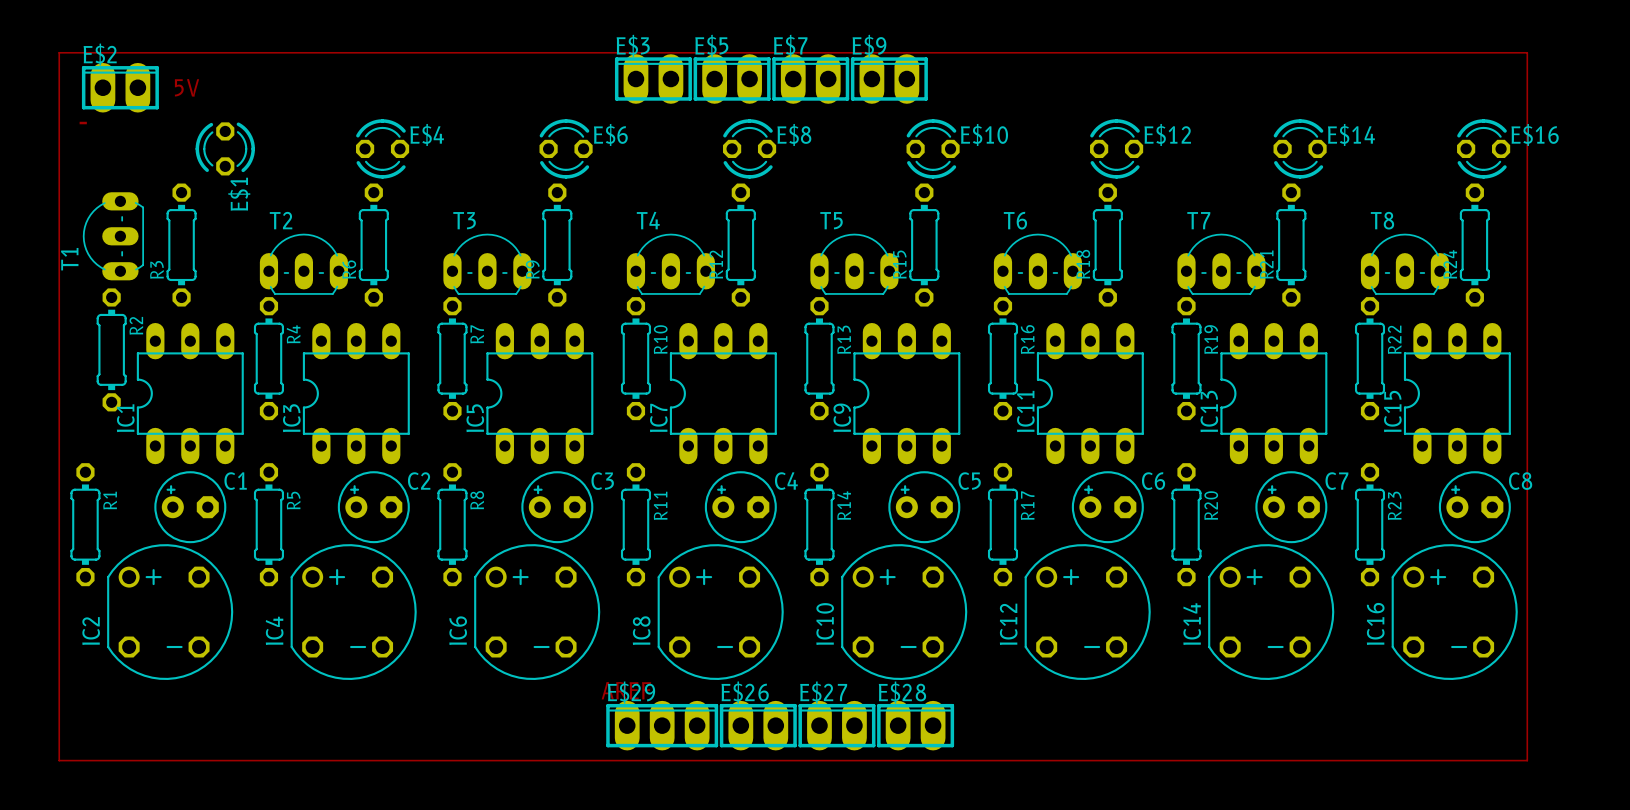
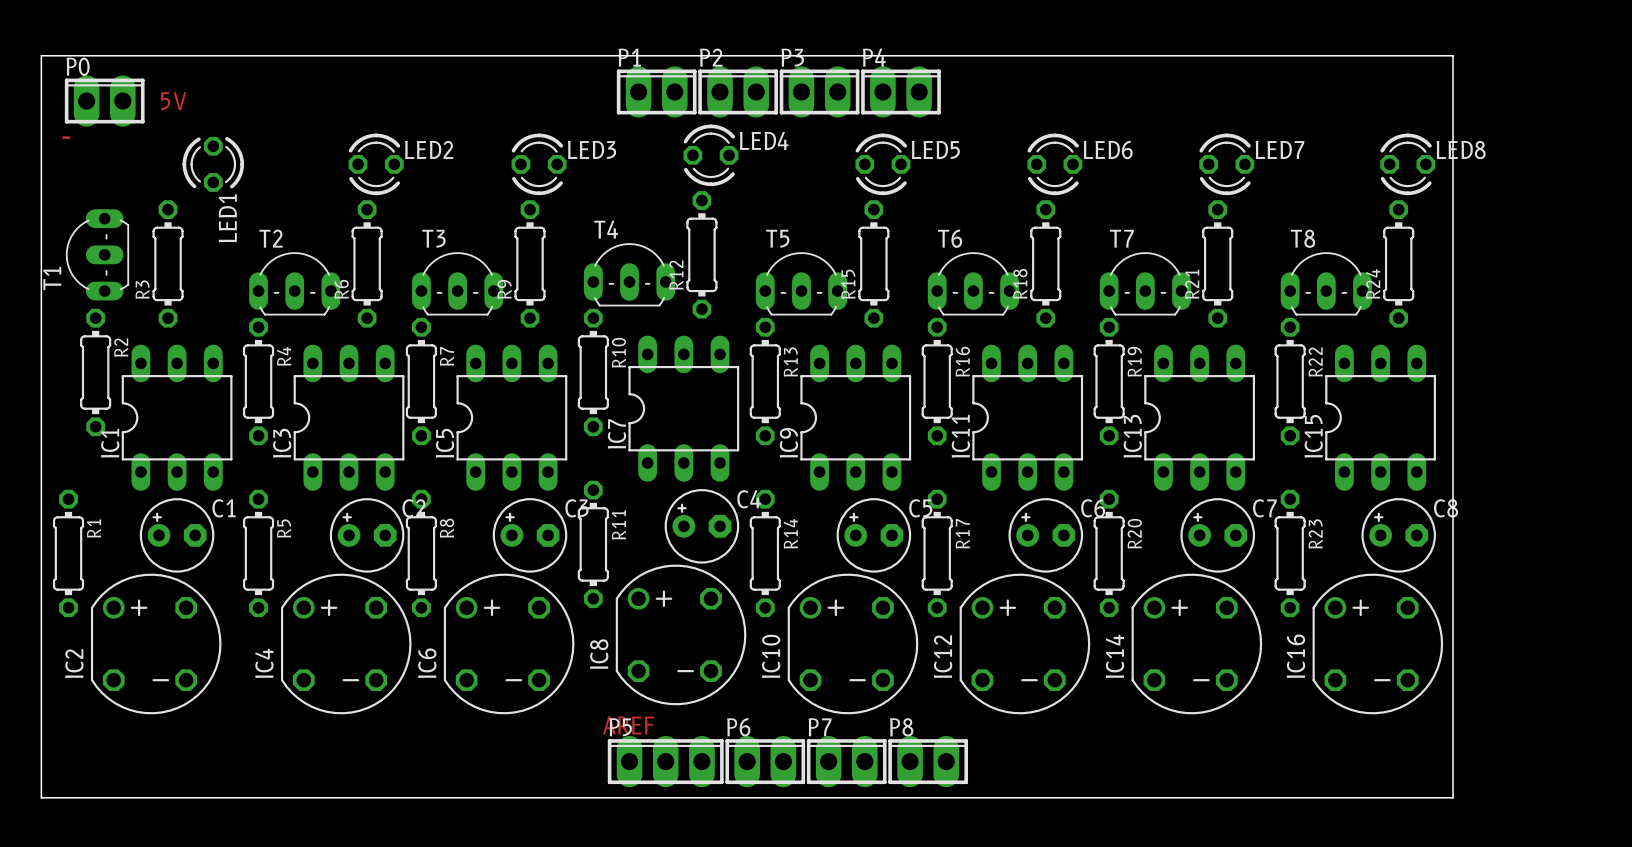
board edge: none -> (41, 55) (1453, 55) (1453, 797) (41, 797) (41, 55)
E$3 name: E$3 (633, 45) -> P1 (629, 57)
E$5 name: E$5 (711, 45) -> P2 (711, 57)
E$7 name: E$7 (790, 45) -> P3 (792, 57)
E$9 name: E$9 (869, 45) -> P4 (874, 57)
track: (59, 52) (1527, 52) (1527, 760) (59, 760) (59, 52) -> none
E$2 name: E$2 (100, 54) -> P0 (78, 66)
E$4 name: E$4 (427, 134) -> LED2 (429, 149)
LED4: none -> (710, 155)
LED3: none -> (539, 164)
E$6: (566, 148) -> none
E$8: (749, 148) -> none
LED5: none -> (882, 164)
E$10: (933, 148) -> none
LED6: none -> (1054, 164)
E$12: (1116, 148) -> none
LED7: none -> (1226, 164)
E$14: (1300, 148) -> none
LED8: none -> (1407, 164)
E$16: (1483, 148) -> none
E$1 name: E$1 (239, 194) -> LED1 (227, 218)
R9 position: (557, 245) -> (530, 263)
R12 position: (740, 245) -> (701, 254)
R15 position: (924, 245) -> (873, 263)
R18 position: (1107, 245) -> (1045, 263)
R21 position: (1291, 245) -> (1217, 263)
R24 position: (1474, 245) -> (1398, 263)
T3 position: (487, 264) -> (457, 283)
T4 position: (670, 264) -> (629, 274)
T5 position: (854, 264) -> (801, 283)
T6 position: (1037, 264) -> (973, 283)
T7 position: (1221, 264) -> (1145, 283)
T8 position: (1404, 264) -> (1326, 283)
R7 position: (452, 358) -> (421, 381)
R10 position: (635, 358) -> (593, 372)
R13 position: (819, 358) -> (765, 381)
R16 position: (1002, 358) -> (937, 381)
R19 position: (1186, 358) -> (1109, 381)
R22 position: (1370, 358) -> (1290, 381)
IC5 position: (539, 393) -> (511, 417)
IC7 position: (723, 393) -> (683, 408)
IC9 position: (906, 393) -> (855, 417)
IC11 position: (1090, 393) -> (1027, 417)
IC13 position: (1273, 393) -> (1199, 417)
IC15 position: (1457, 393) -> (1380, 417)
C3 position: (557, 507) -> (530, 535)
C4 position: (740, 507) -> (701, 526)
C5 position: (924, 507) -> (873, 535)
C6 position: (1107, 507) -> (1045, 535)
C7 position: (1291, 507) -> (1217, 535)
C8 position: (1474, 507) -> (1398, 535)
R8 position: (452, 524) -> (421, 553)
R11 position: (635, 524) -> (593, 544)
R14 position: (819, 524) -> (765, 553)
R17 position: (1002, 524) -> (937, 553)
R20 position: (1186, 524) -> (1109, 553)
R23 position: (1370, 524) -> (1290, 553)
IC6 position: (537, 612) -> (509, 643)
IC8 position: (720, 612) -> (681, 634)
IC10 position: (904, 612) -> (853, 643)
IC12 position: (1087, 612) -> (1024, 643)
IC14 position: (1271, 612) -> (1196, 643)
IC16 position: (1454, 612) -> (1377, 643)
E$29 name: E$29 (631, 692) -> P5 (620, 727)
E$26 name: E$26 (745, 692) -> P6 (738, 727)
E$27 name: E$27 (823, 692) -> P7 (820, 727)
E$28 name: E$28 (902, 692) -> P8 (901, 727)

